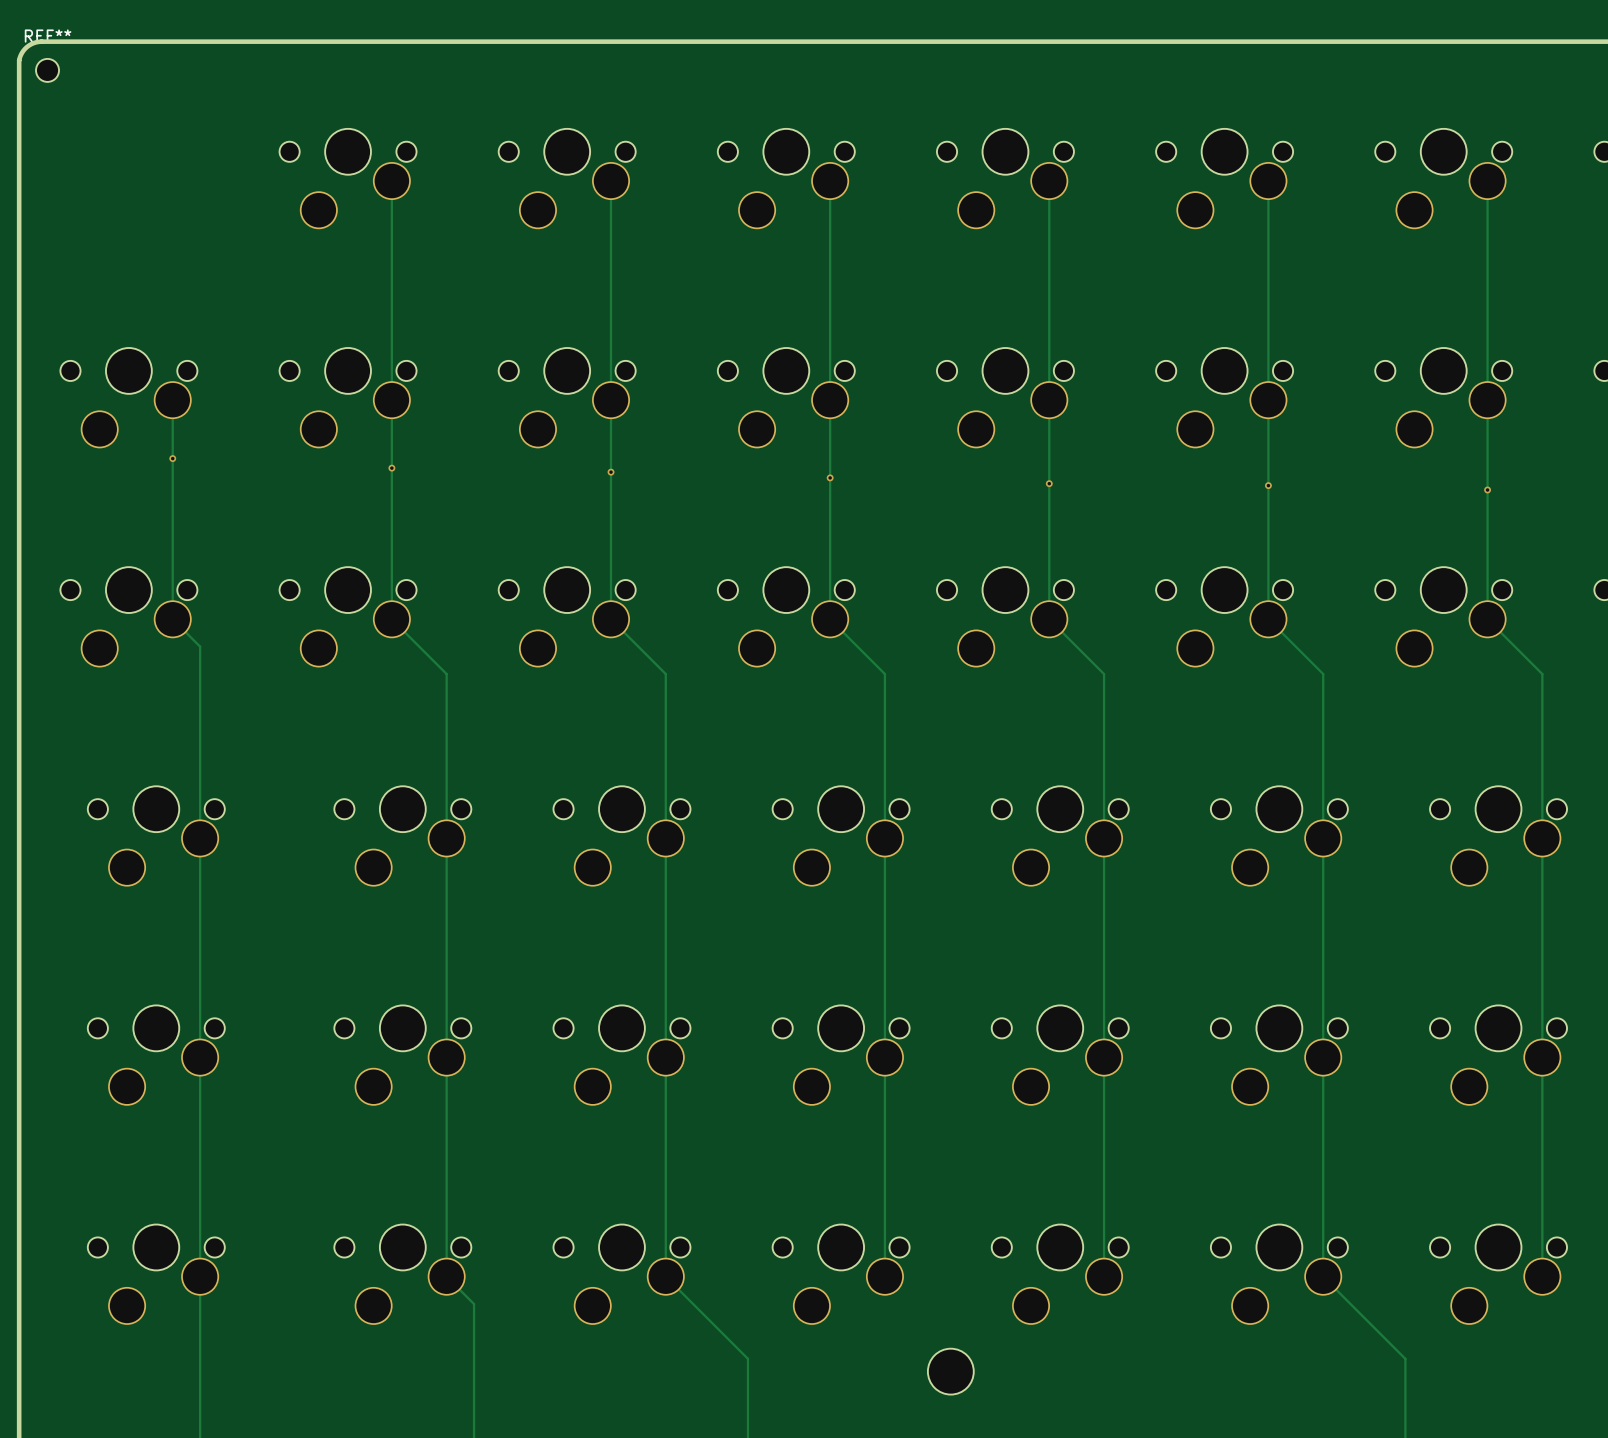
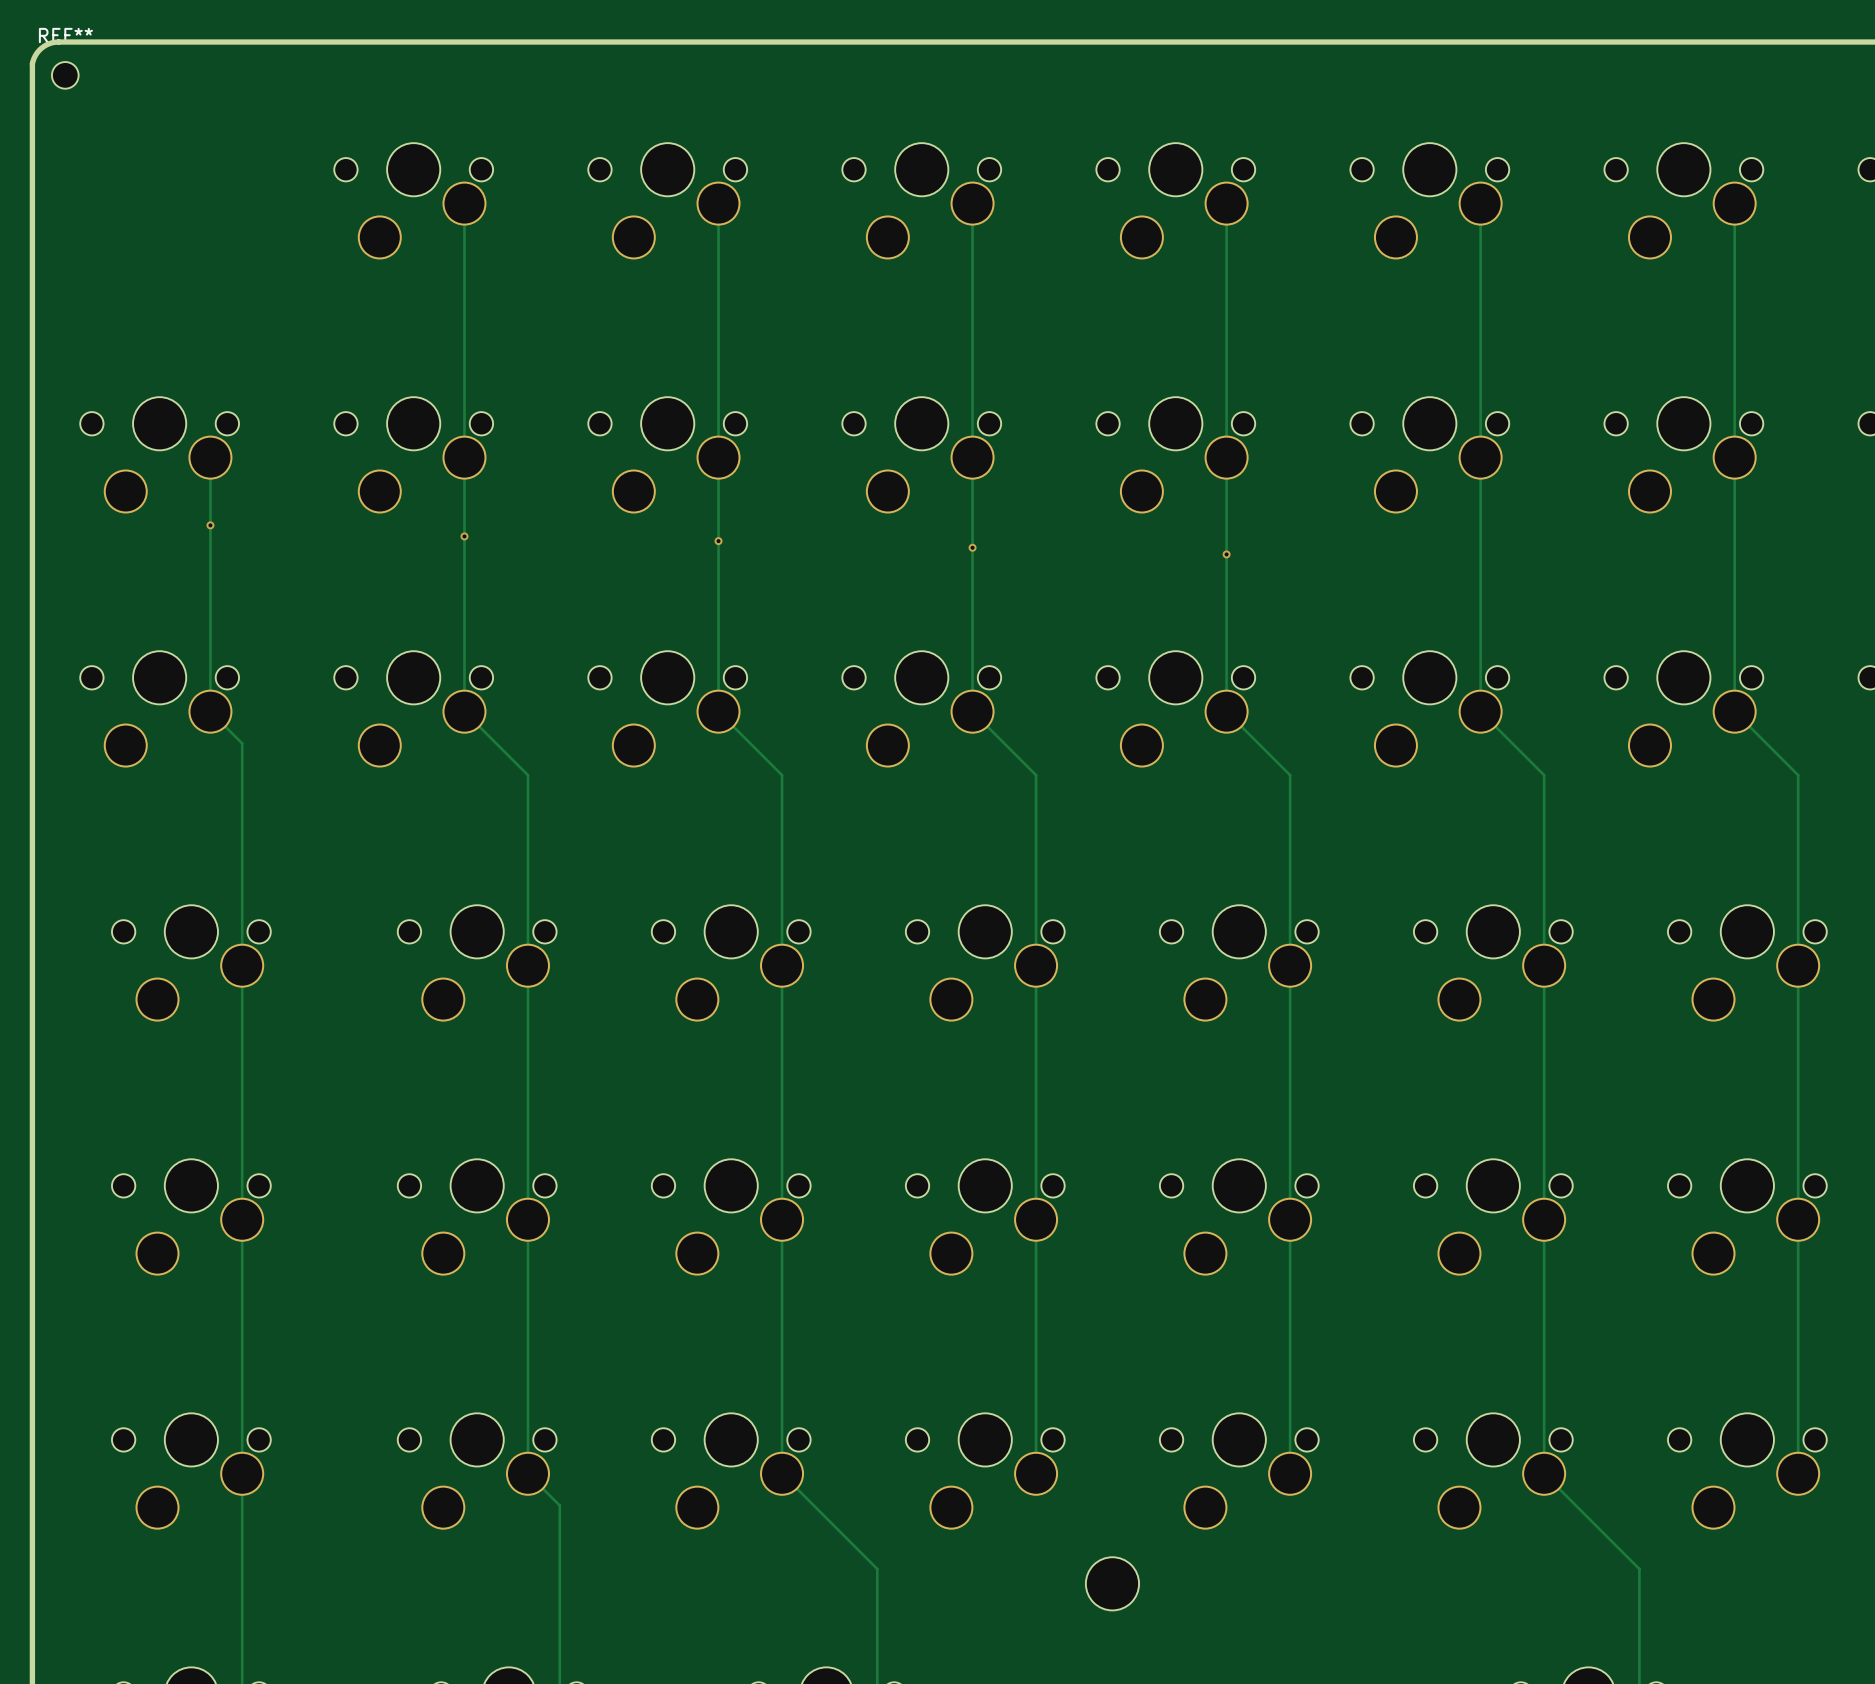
via: (1268, 485) -> none
via: (1487, 489) -> none

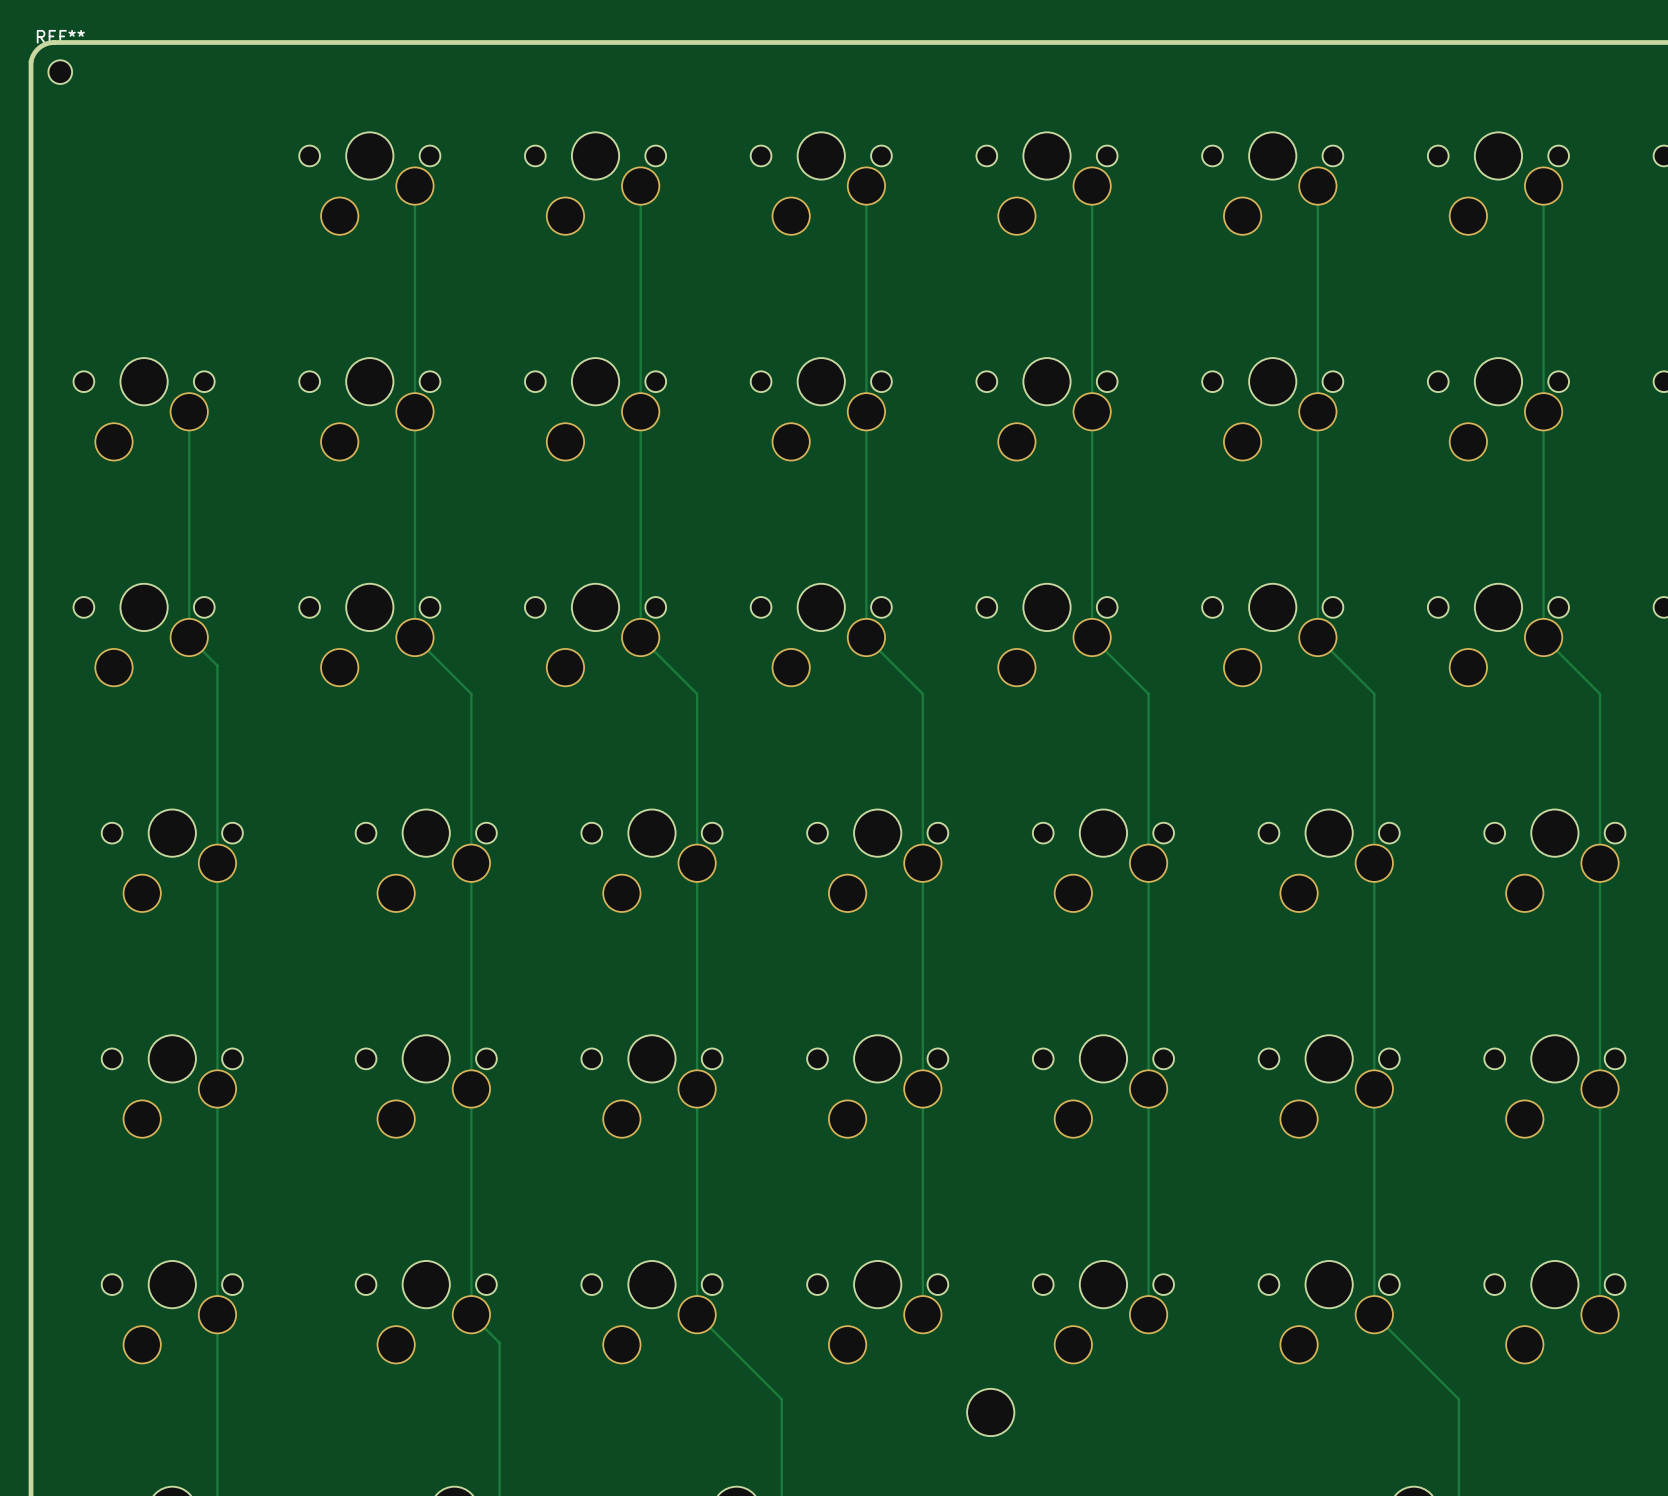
via: (210, 525) -> none
via: (464, 536) -> none
via: (718, 541) -> none
via: (972, 547) -> none
via: (1226, 554) -> none

